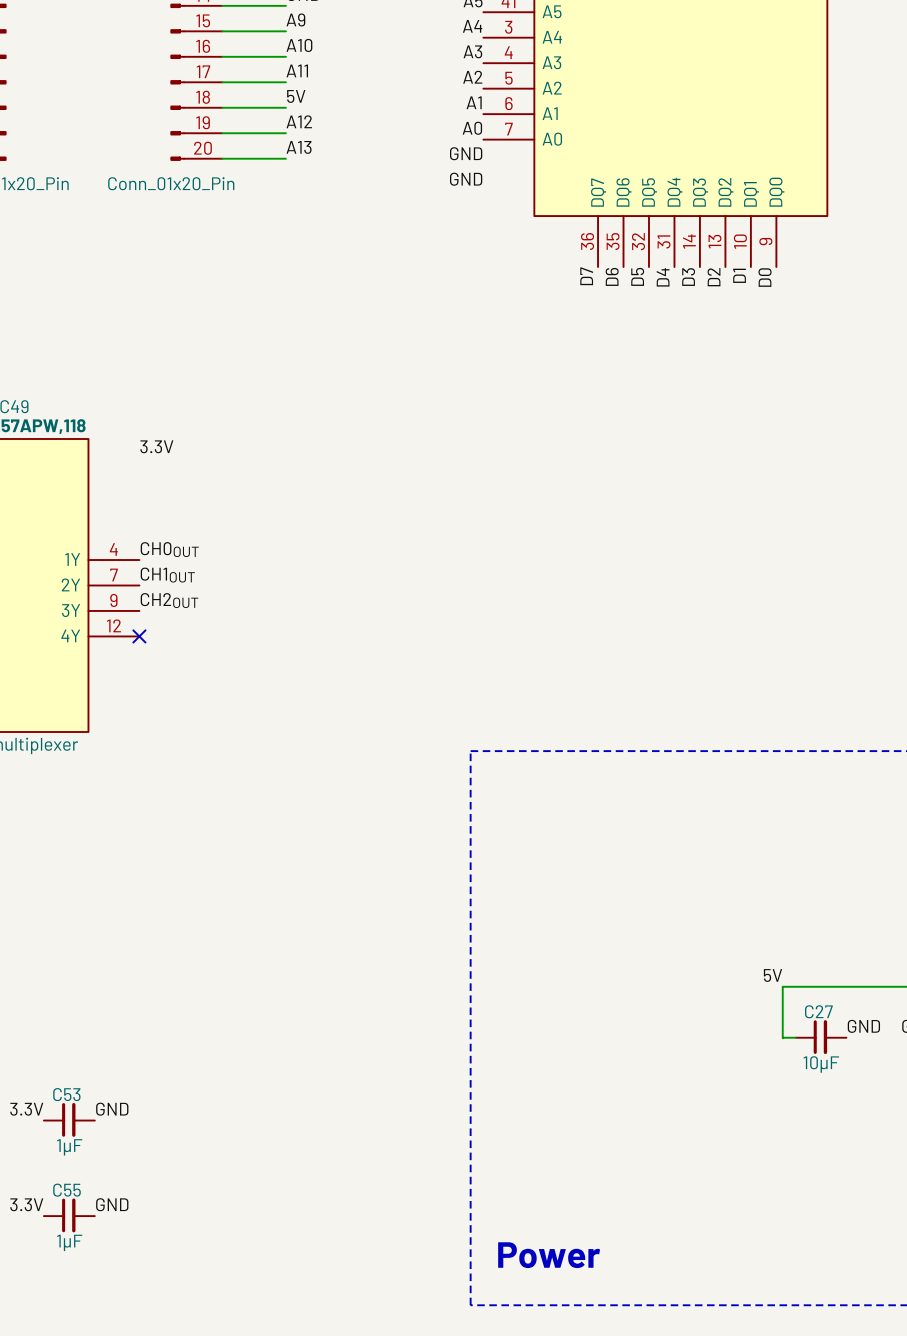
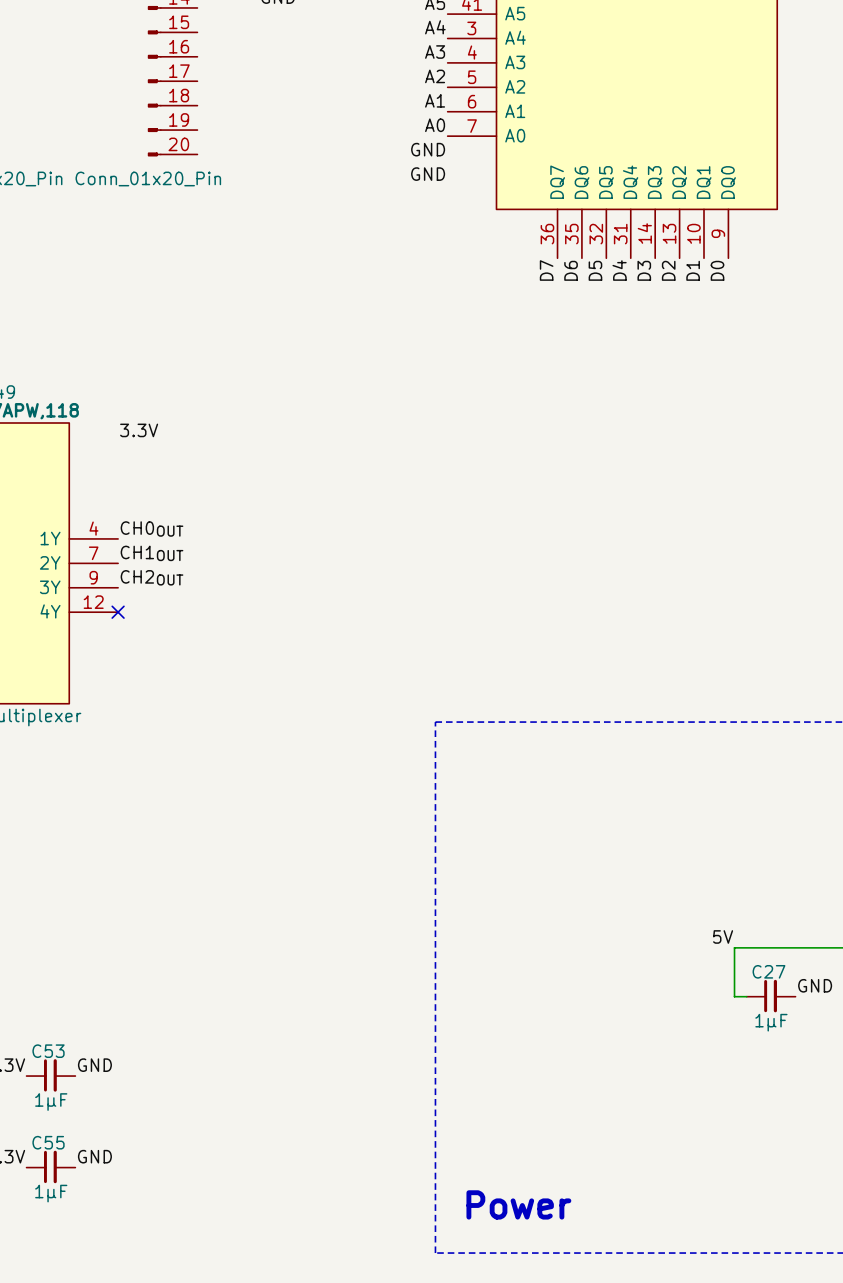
wire: (222, 5) (285, 5) -> none
label: A9 (295, 19) -> none
wire: (222, 31) (285, 31) -> none
label: A10 (299, 45) -> none
wire: (222, 56) (285, 56) -> none
label: A11 (297, 70) -> none
wire: (222, 82) (285, 82) -> none
label: 5V (296, 96) -> none
wire: (222, 107) (285, 107) -> none
label: A12 (299, 121) -> none
wire: (222, 133) (285, 133) -> none
label: A13 (299, 147) -> none
wire: (222, 158) (285, 158) -> none
C27 value: 10μF (821, 1064) -> 1μF (771, 1022)

